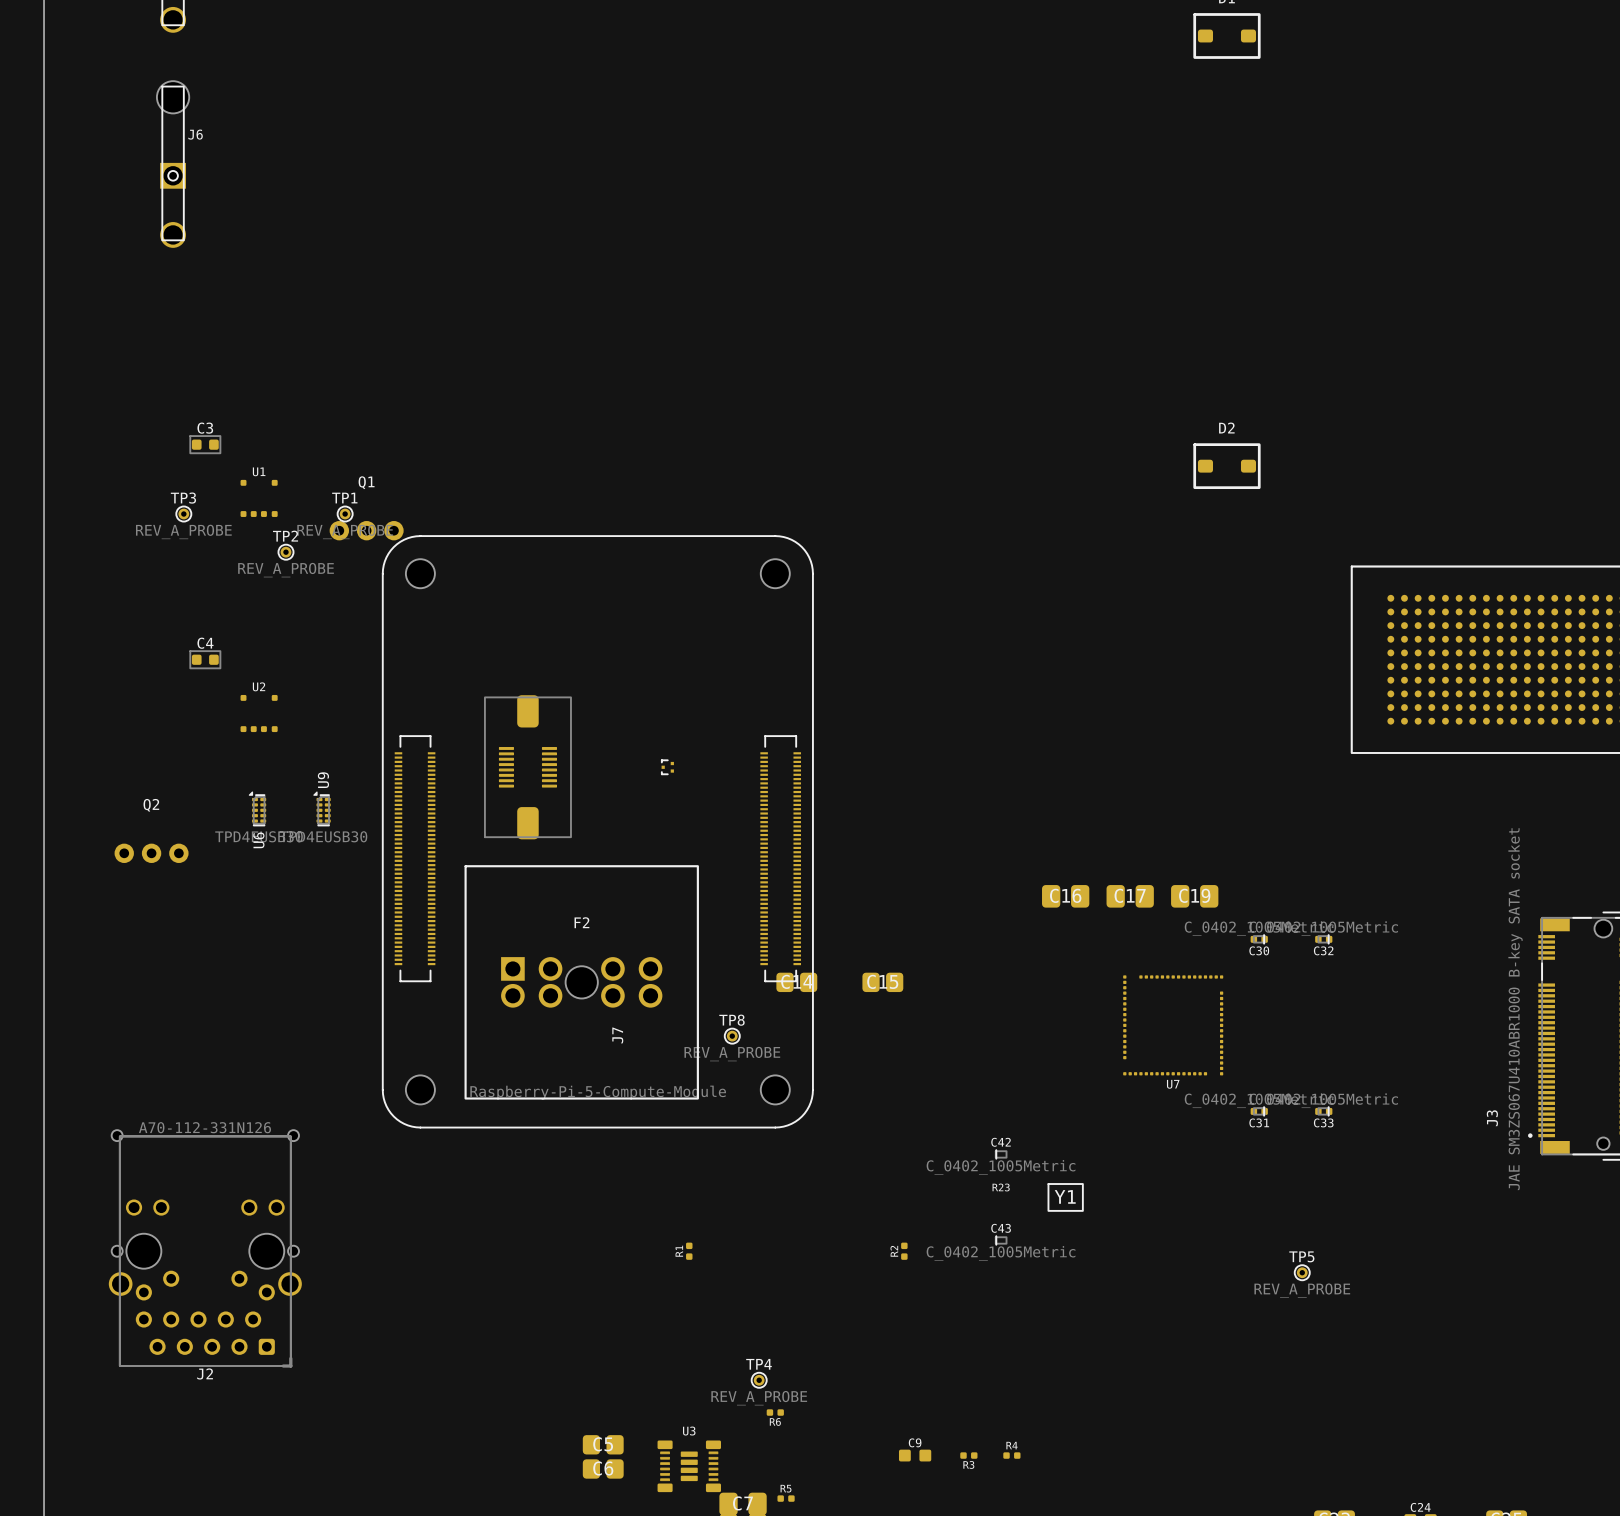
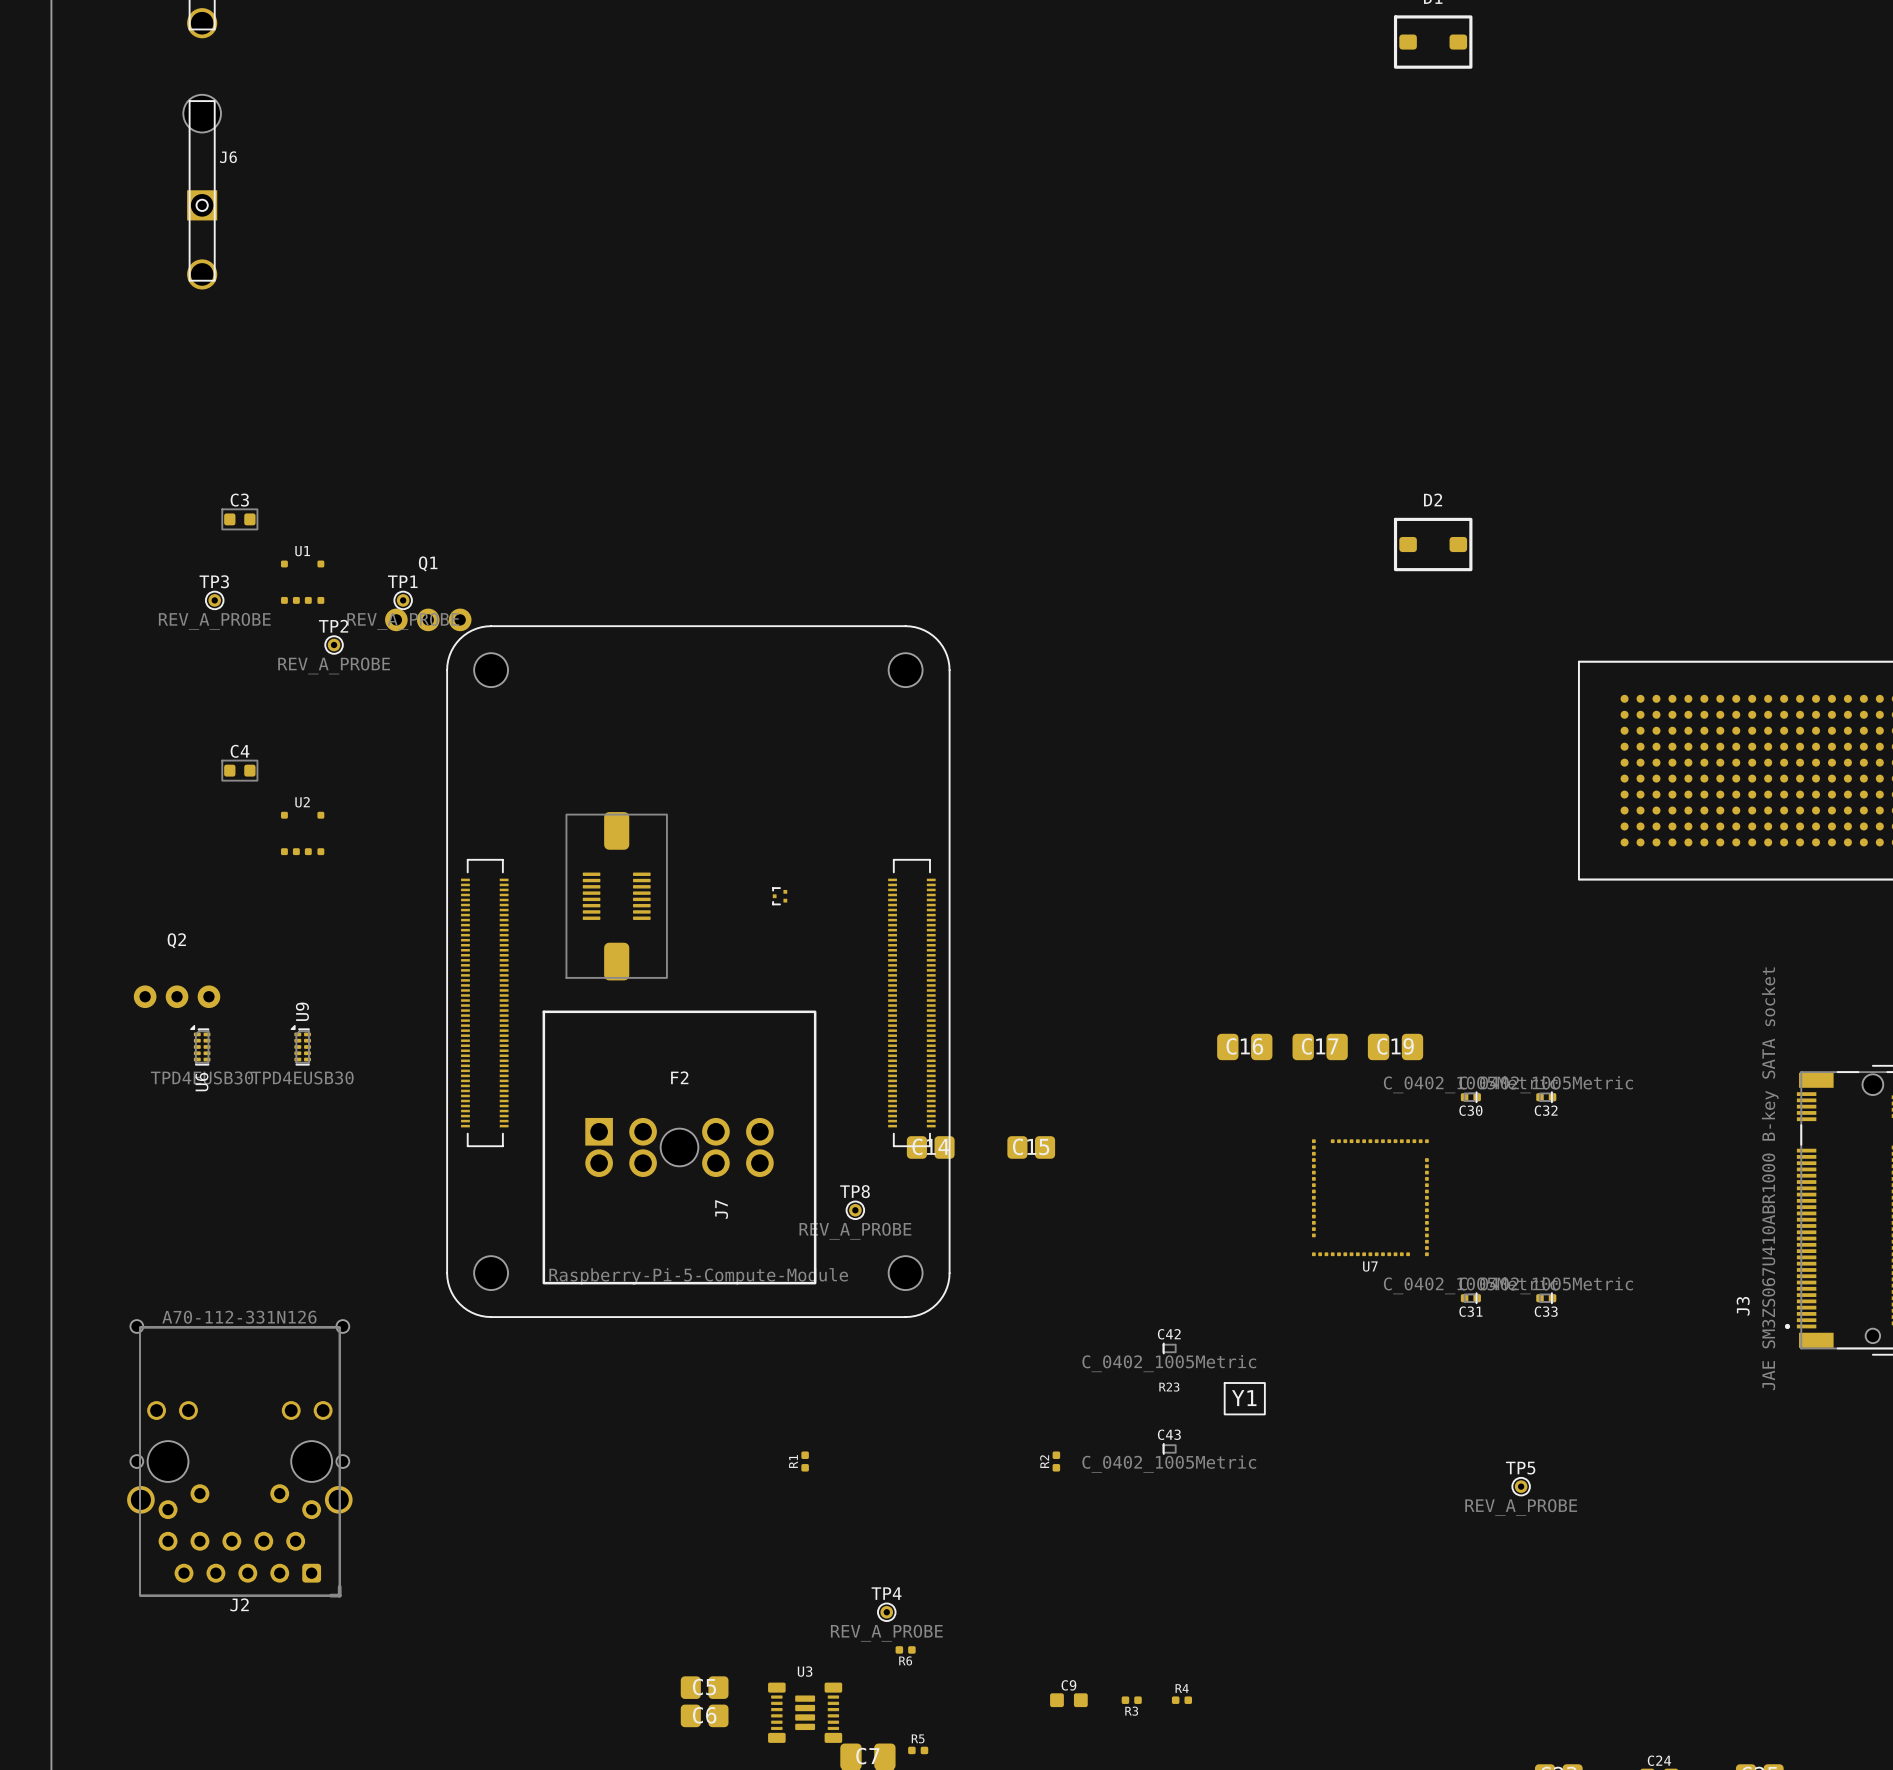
U6 position: (257, 808) -> (200, 1045)
U9 position: (322, 808) -> (300, 1045)

